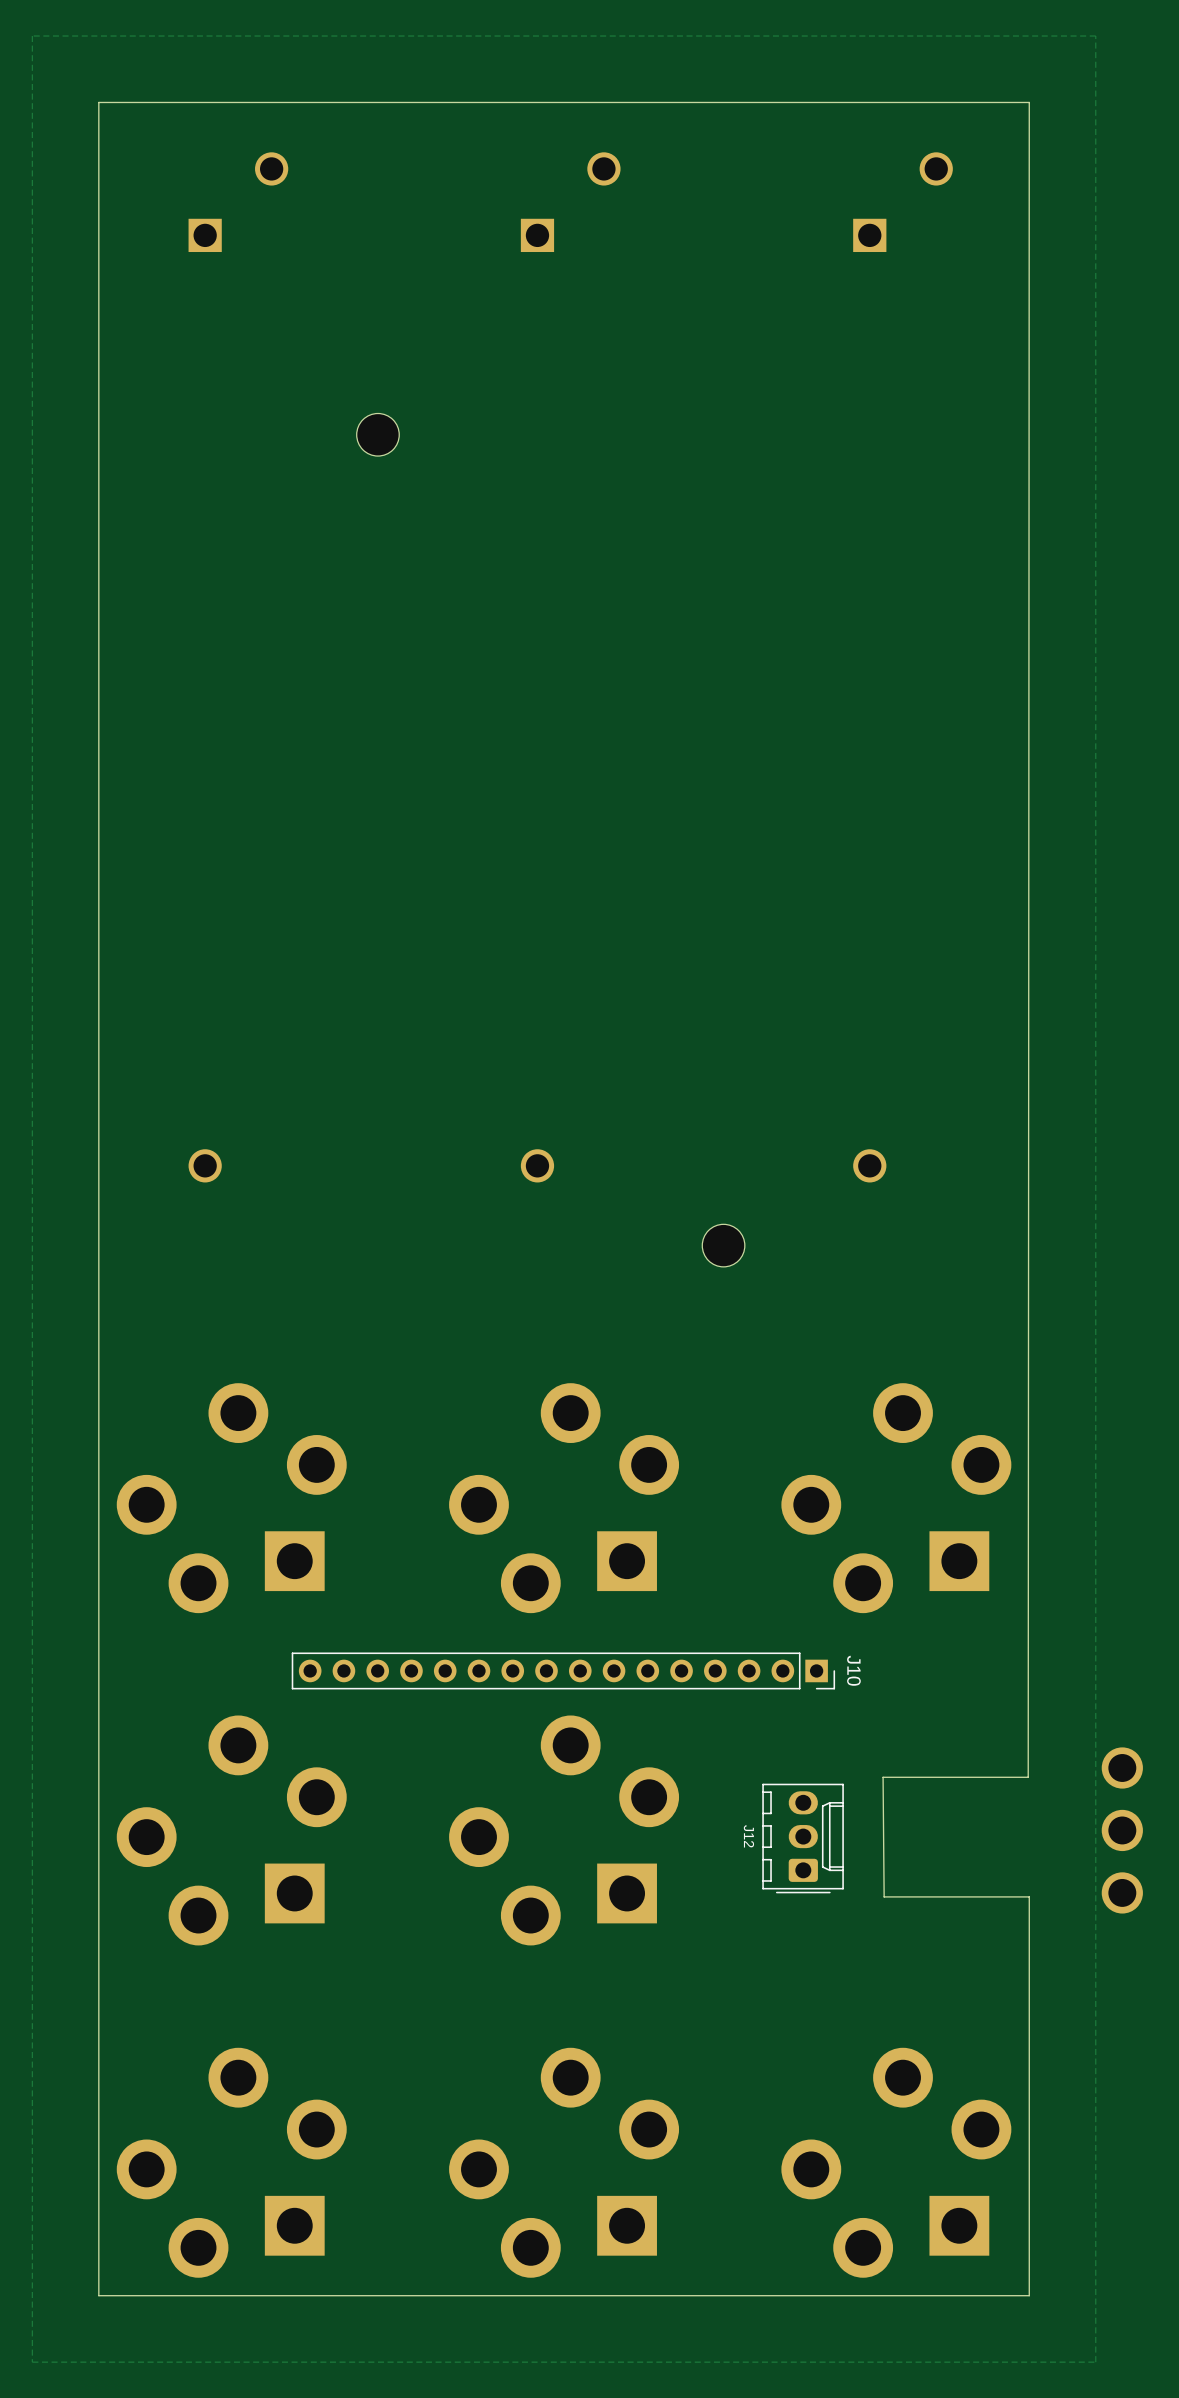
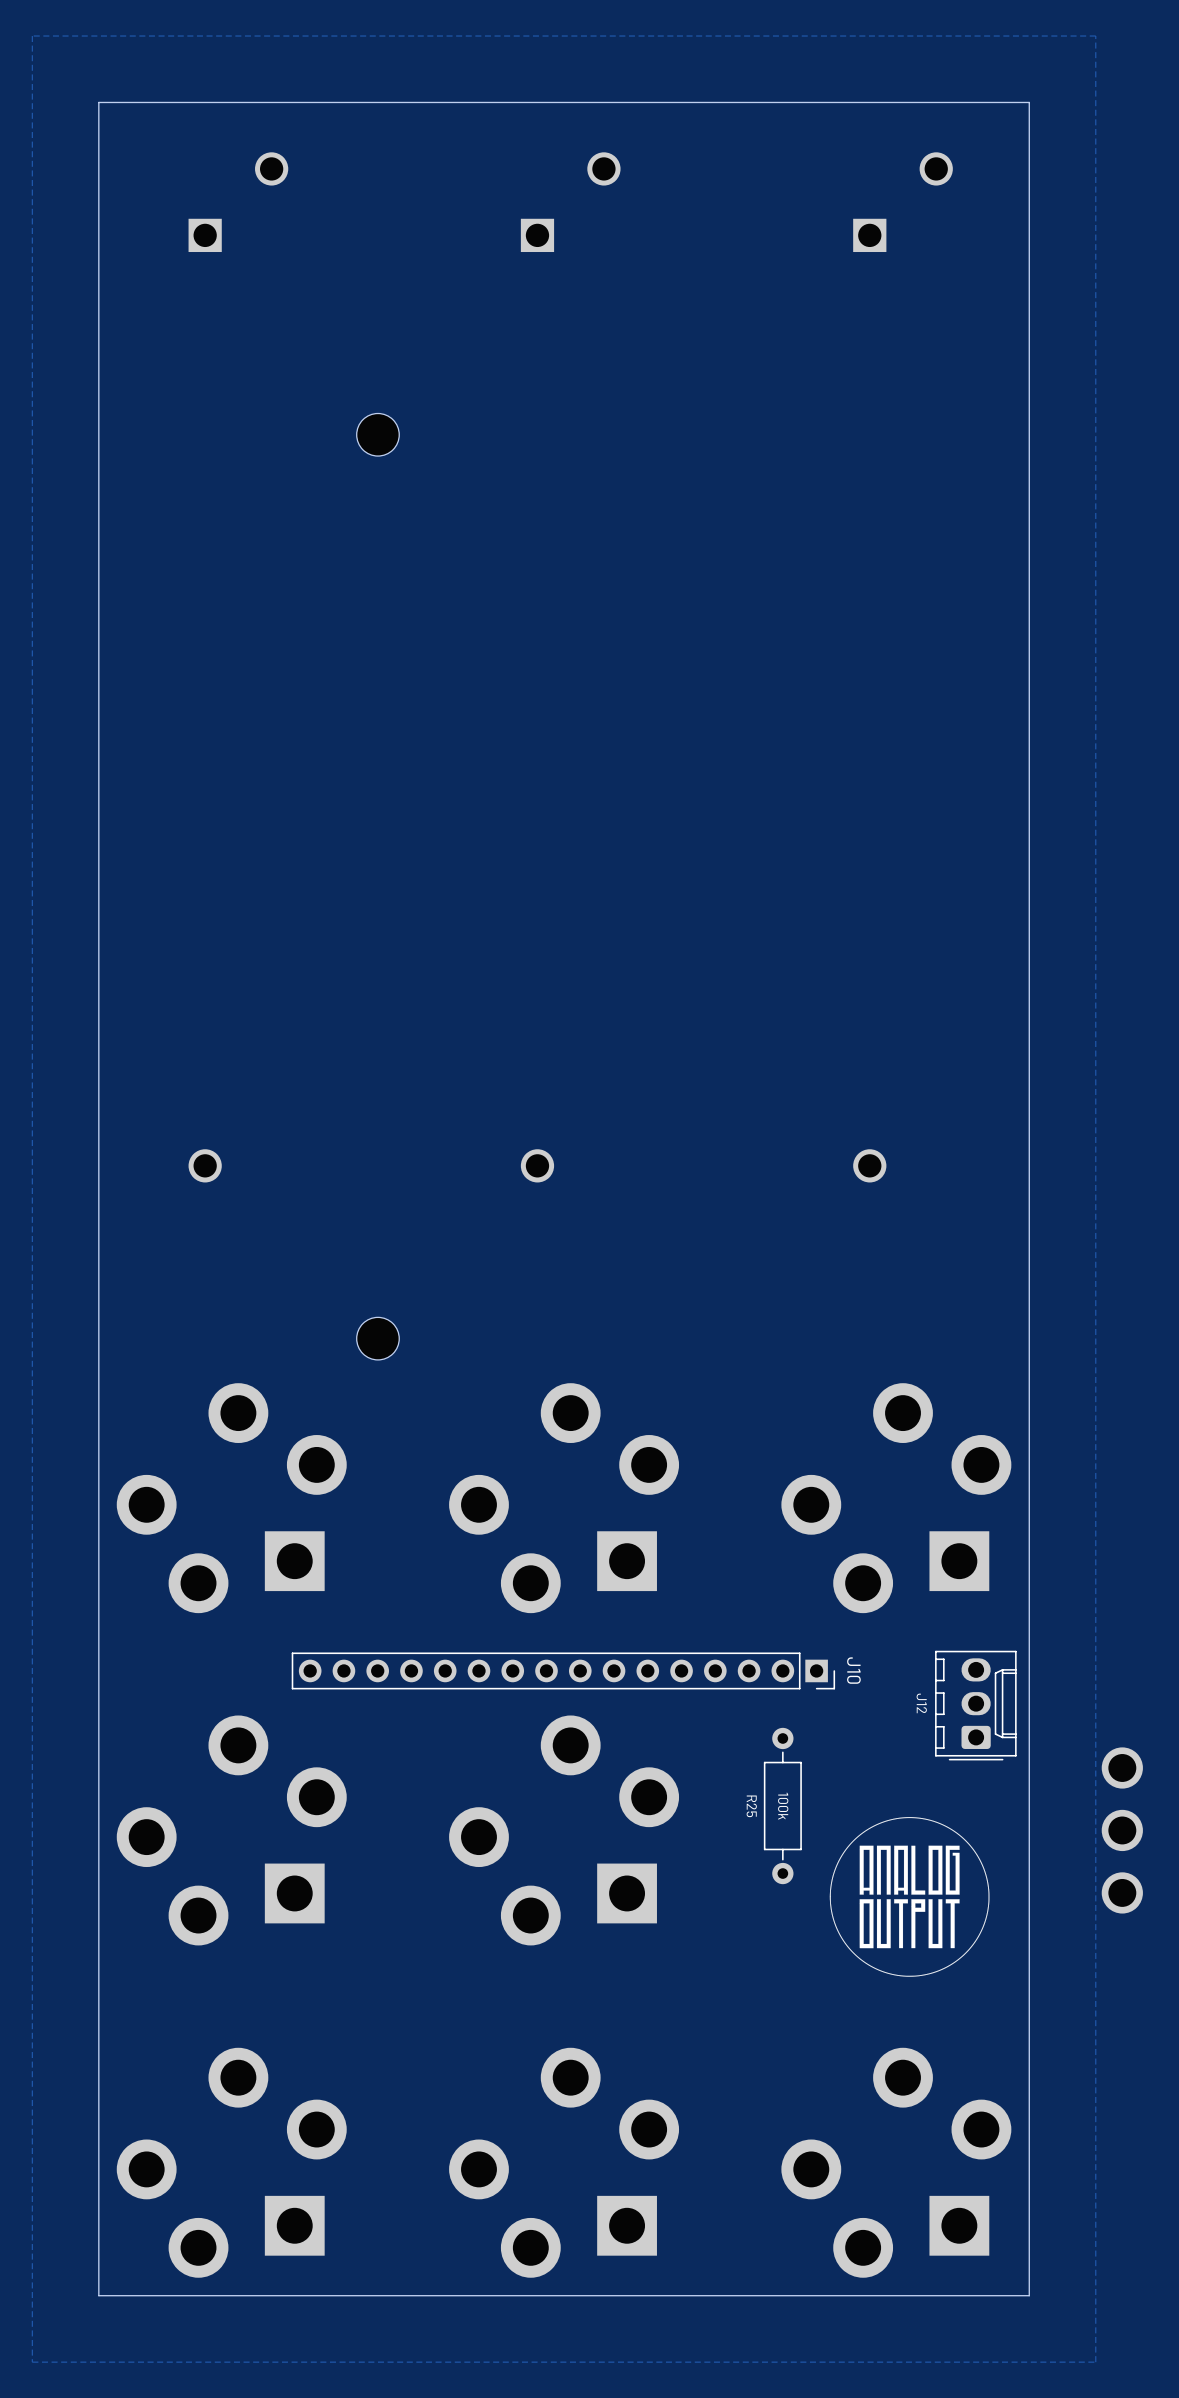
board edge: (1029, 102) (1028, 1777) (883, 1777) (884, 1896) (1029, 1896) -> (1029, 102) (1029, 1896)
part: (723, 1245) -> none
part: none -> (377, 1338)
R25: none -> 100k (782, 1806)
drawing: none -> [829, 1817, 990, 1977]
J12 position: (803, 1838) -> (975, 1705)

